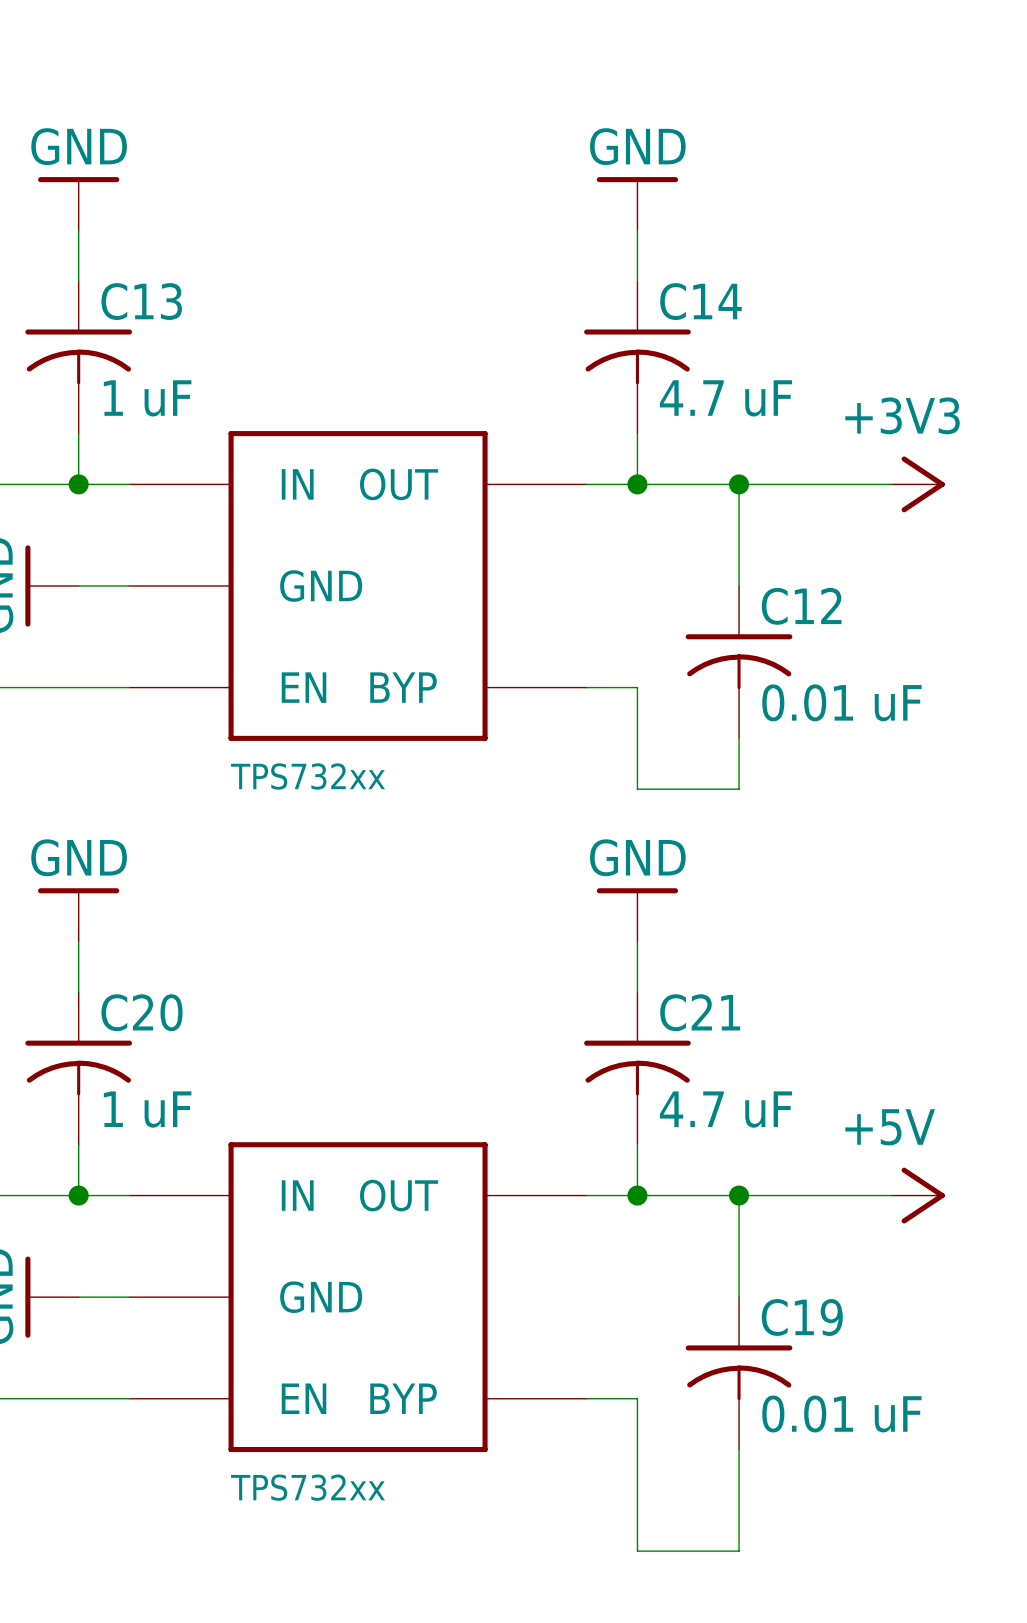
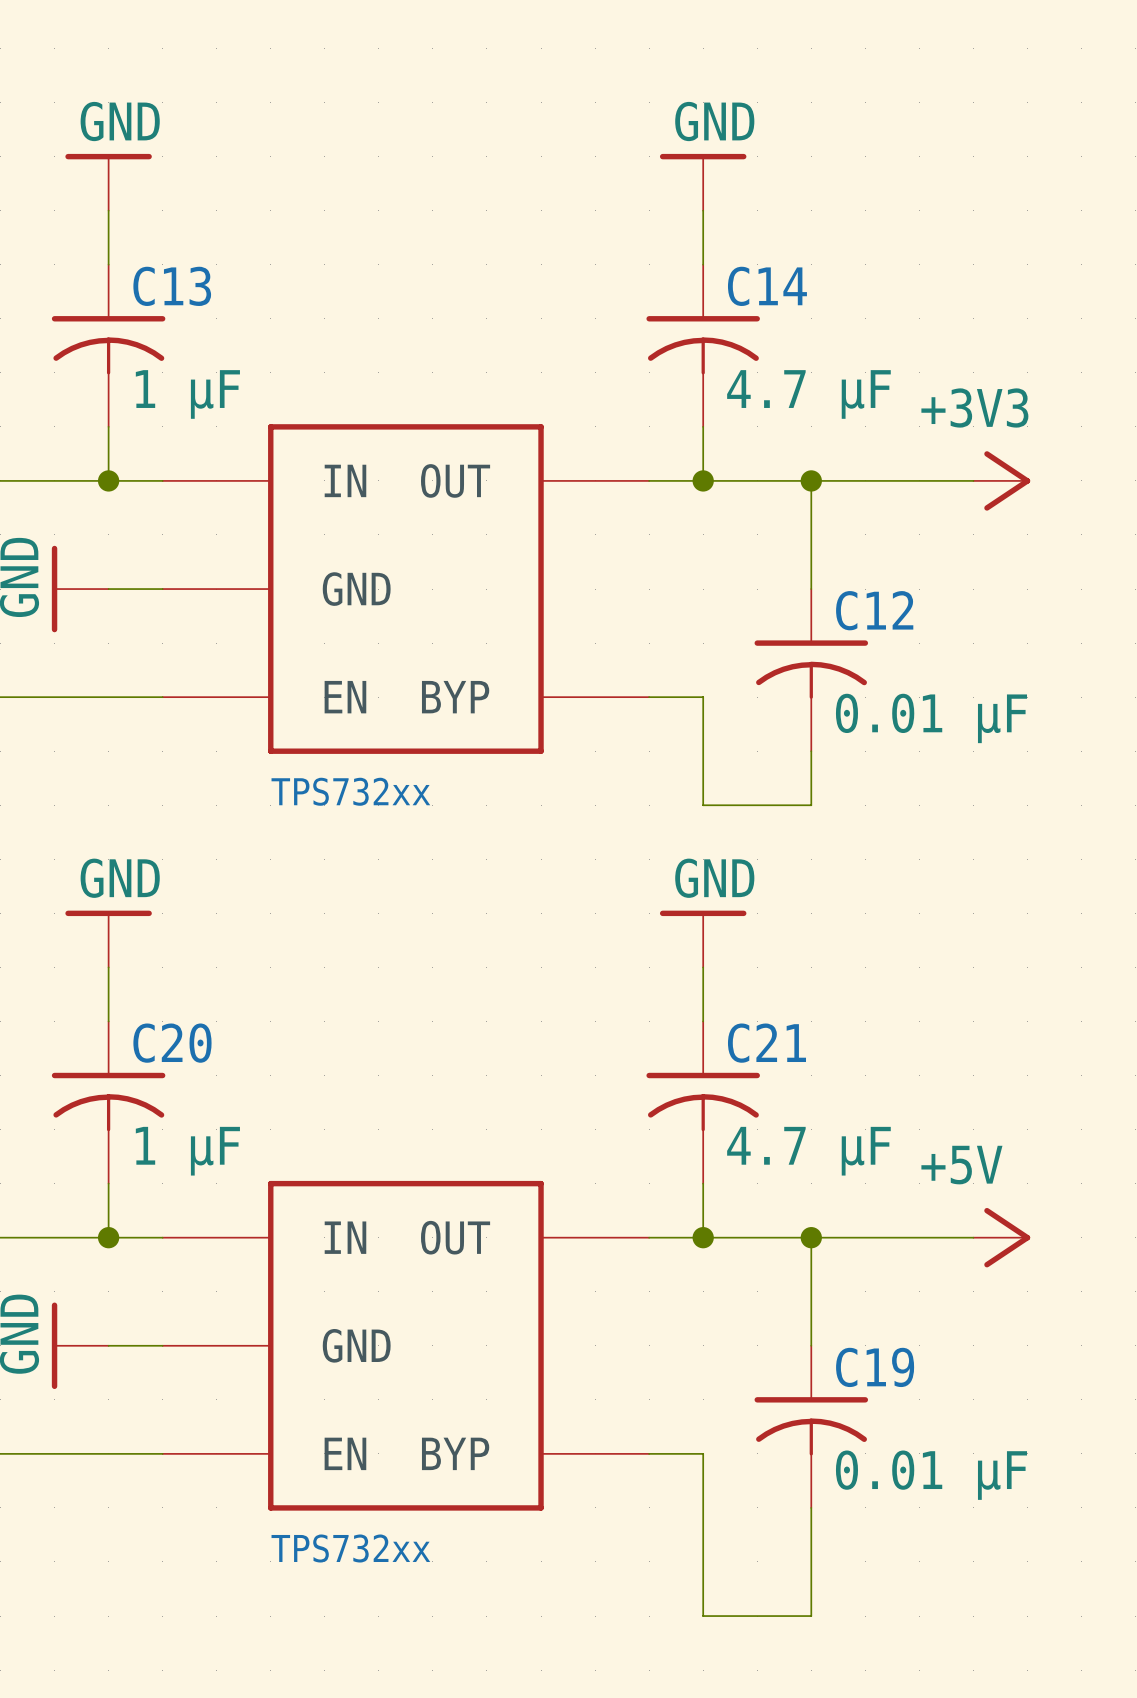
C13 value: 1 uF (147, 398) -> 1 μF (187, 394)
C14 value: 4.7 uF (725, 398) -> 4.7 μF (808, 394)
C12 value: 0.01 uF (841, 702) -> 0.01 μF (931, 718)
C20 value: 1 uF (147, 1109) -> 1 μF (187, 1151)
C21 value: 4.7 uF (725, 1109) -> 4.7 μF (808, 1151)
C19 value: 0.01 uF (841, 1414) -> 0.01 μF (931, 1475)

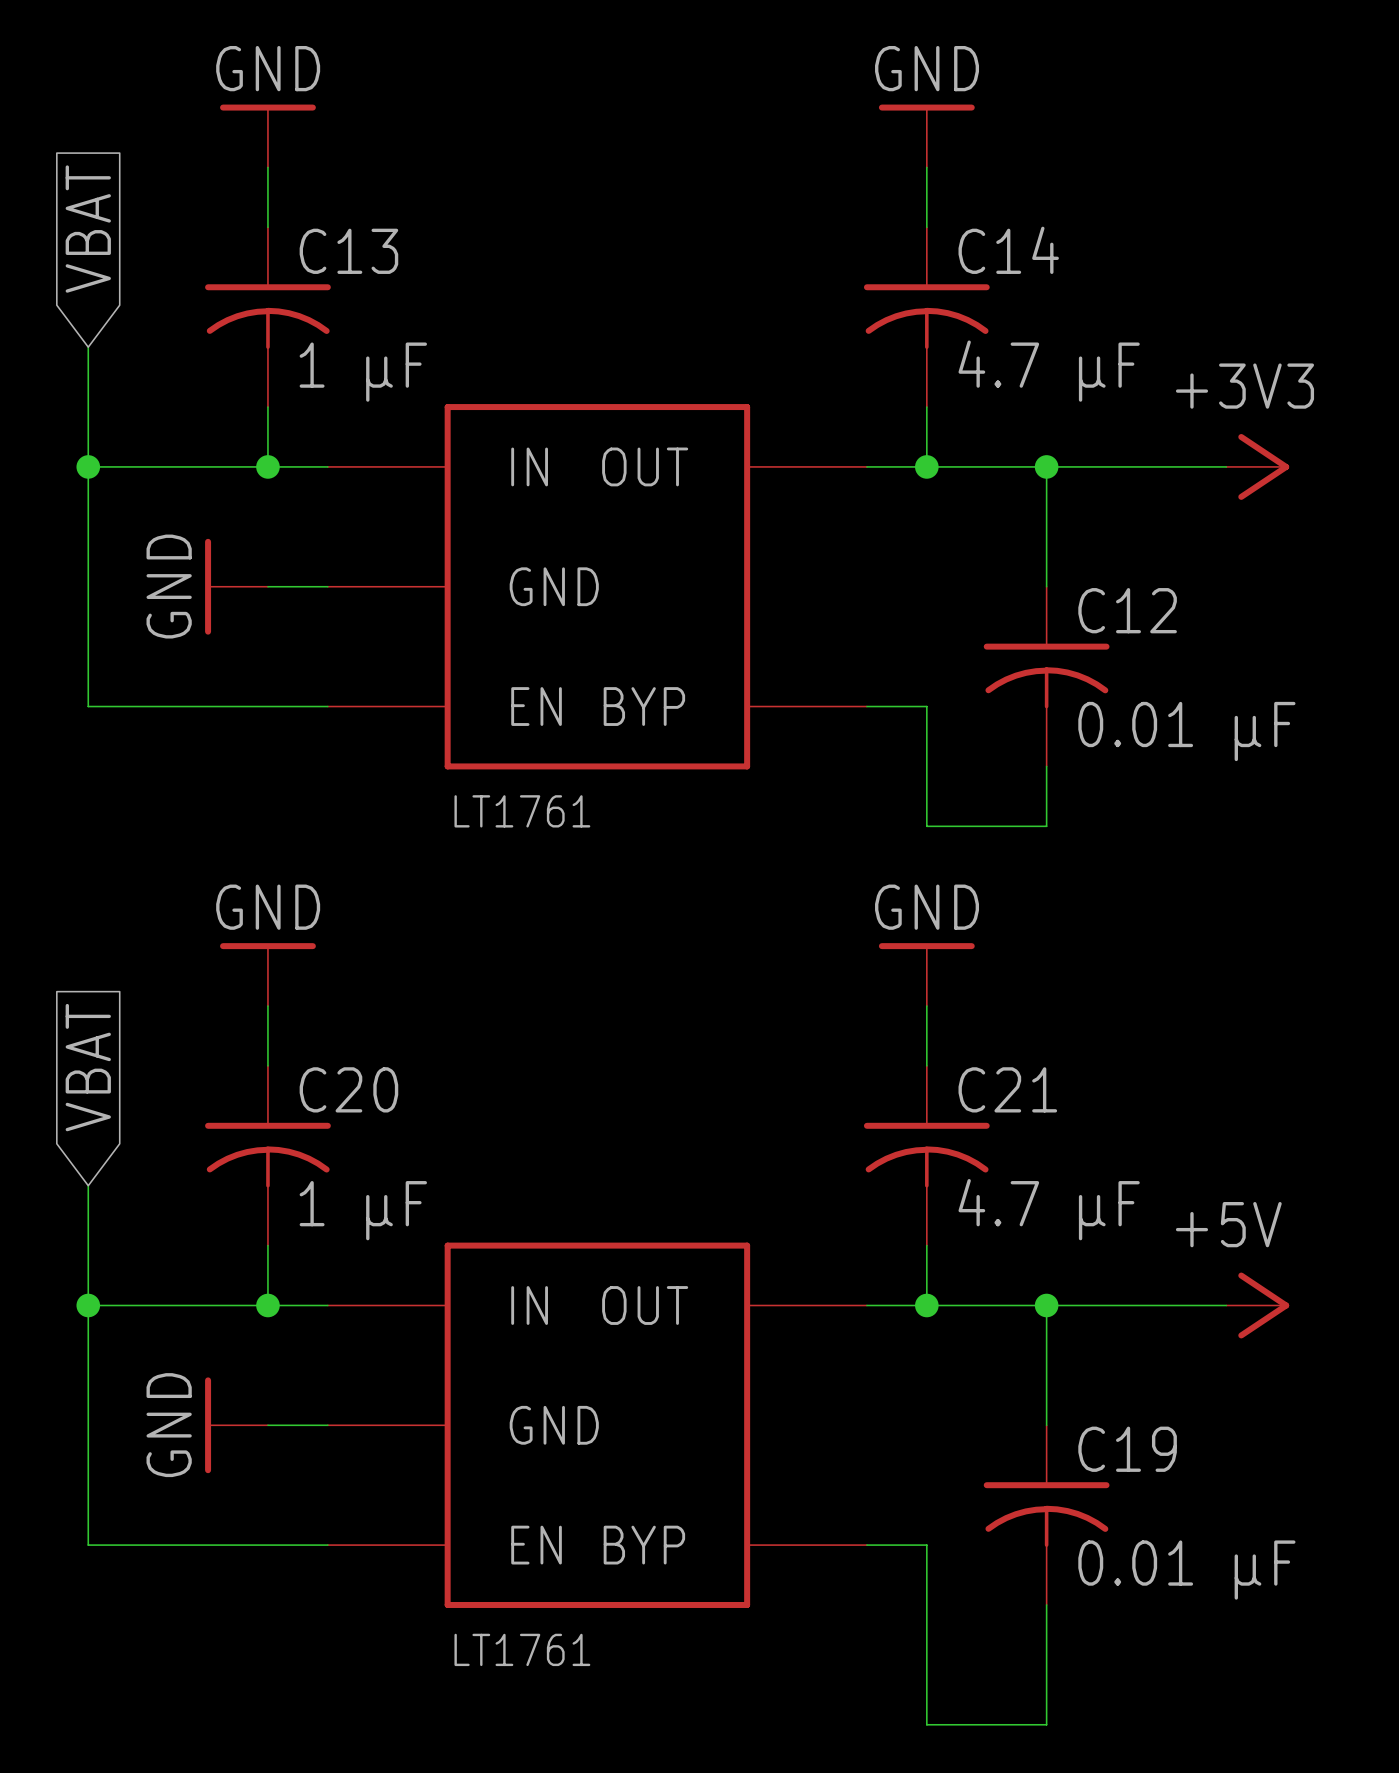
part text: TPS732xx (350, 791) -> LT1761 (522, 811)
part text: TPS732xx (350, 1548) -> LT1761 (522, 1649)

